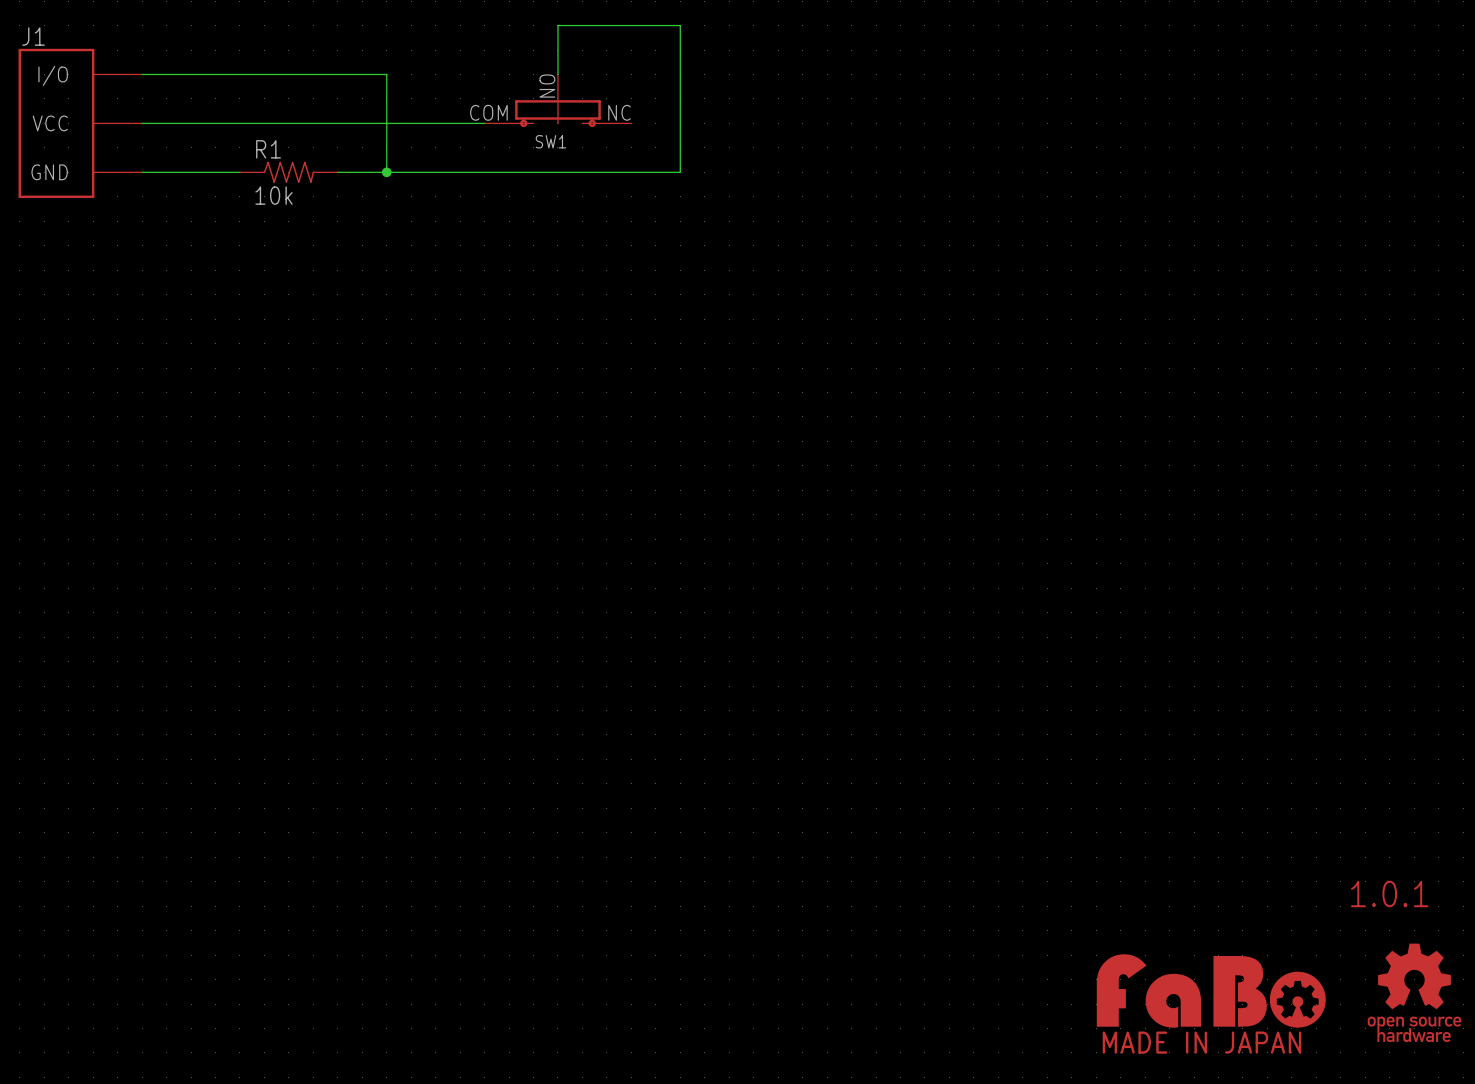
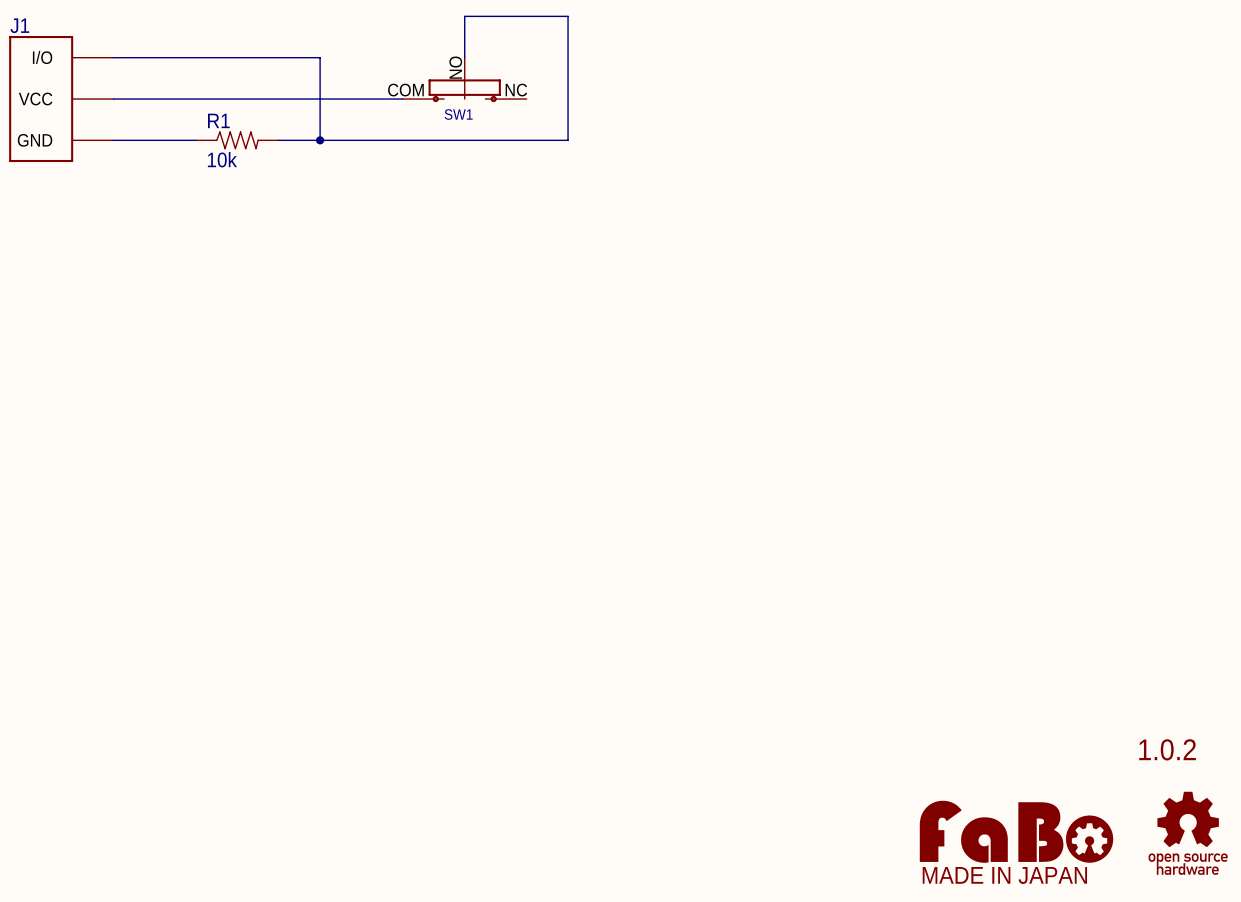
text: 1.0.1 (1389, 893) -> 1.0.2 (1167, 749)

